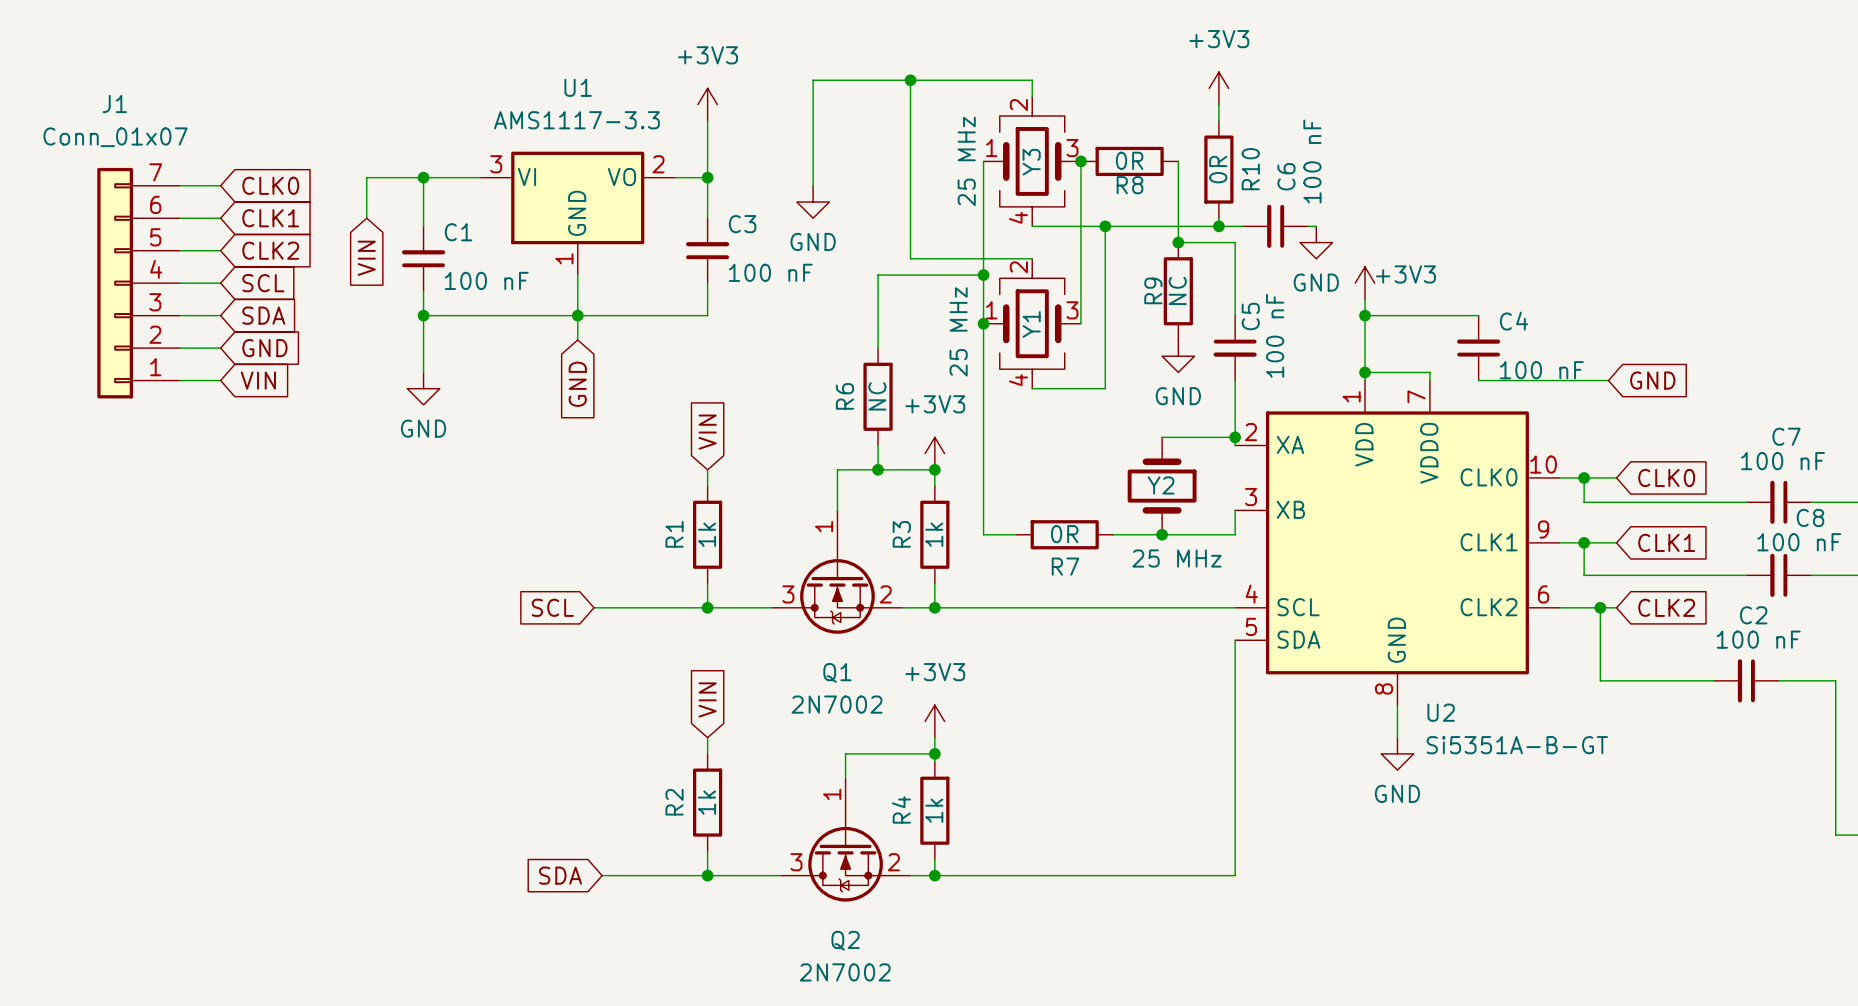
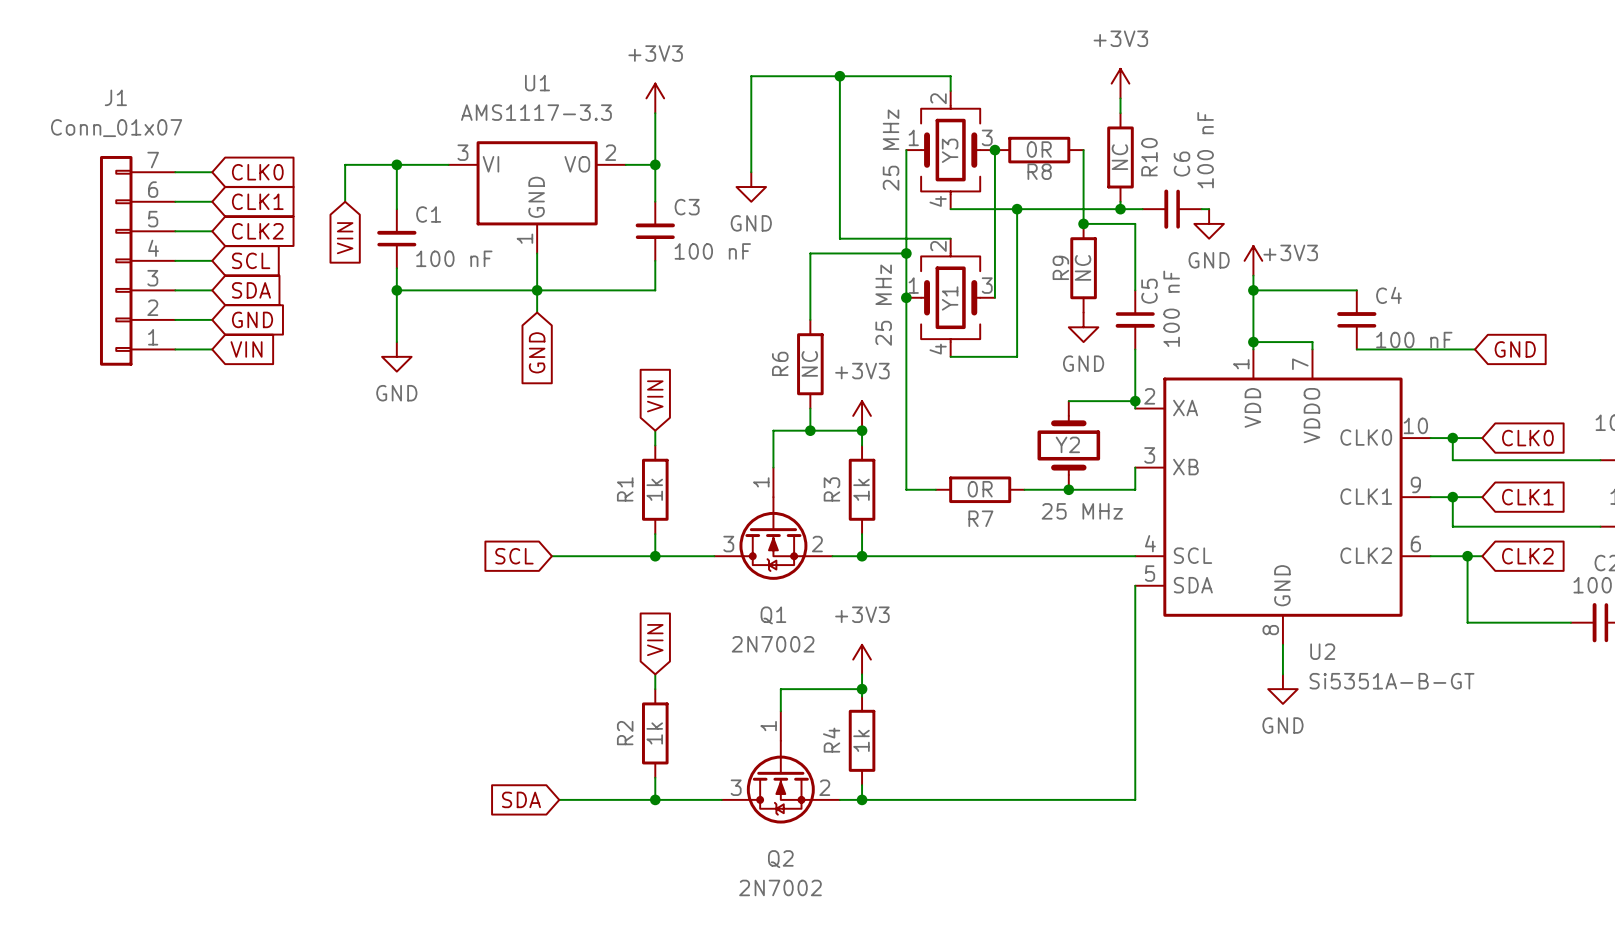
R10 value: 0R (1218, 169) -> NC (1119, 157)

